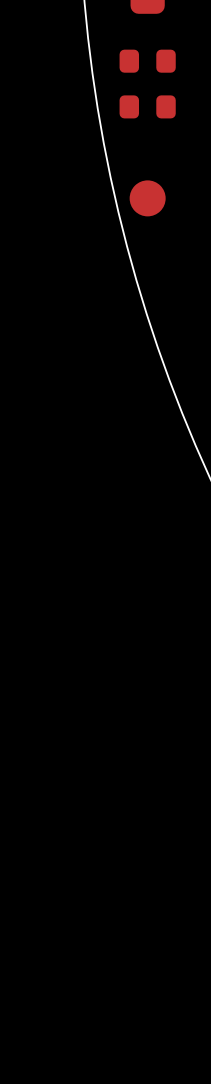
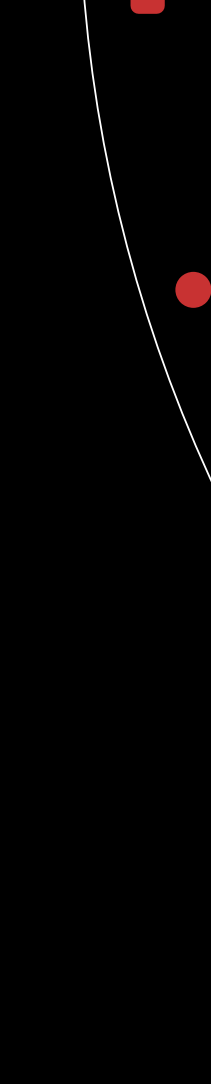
part: (147, 61) -> none
part: (147, 106) -> none
part position: (147, 198) -> (193, 289)

